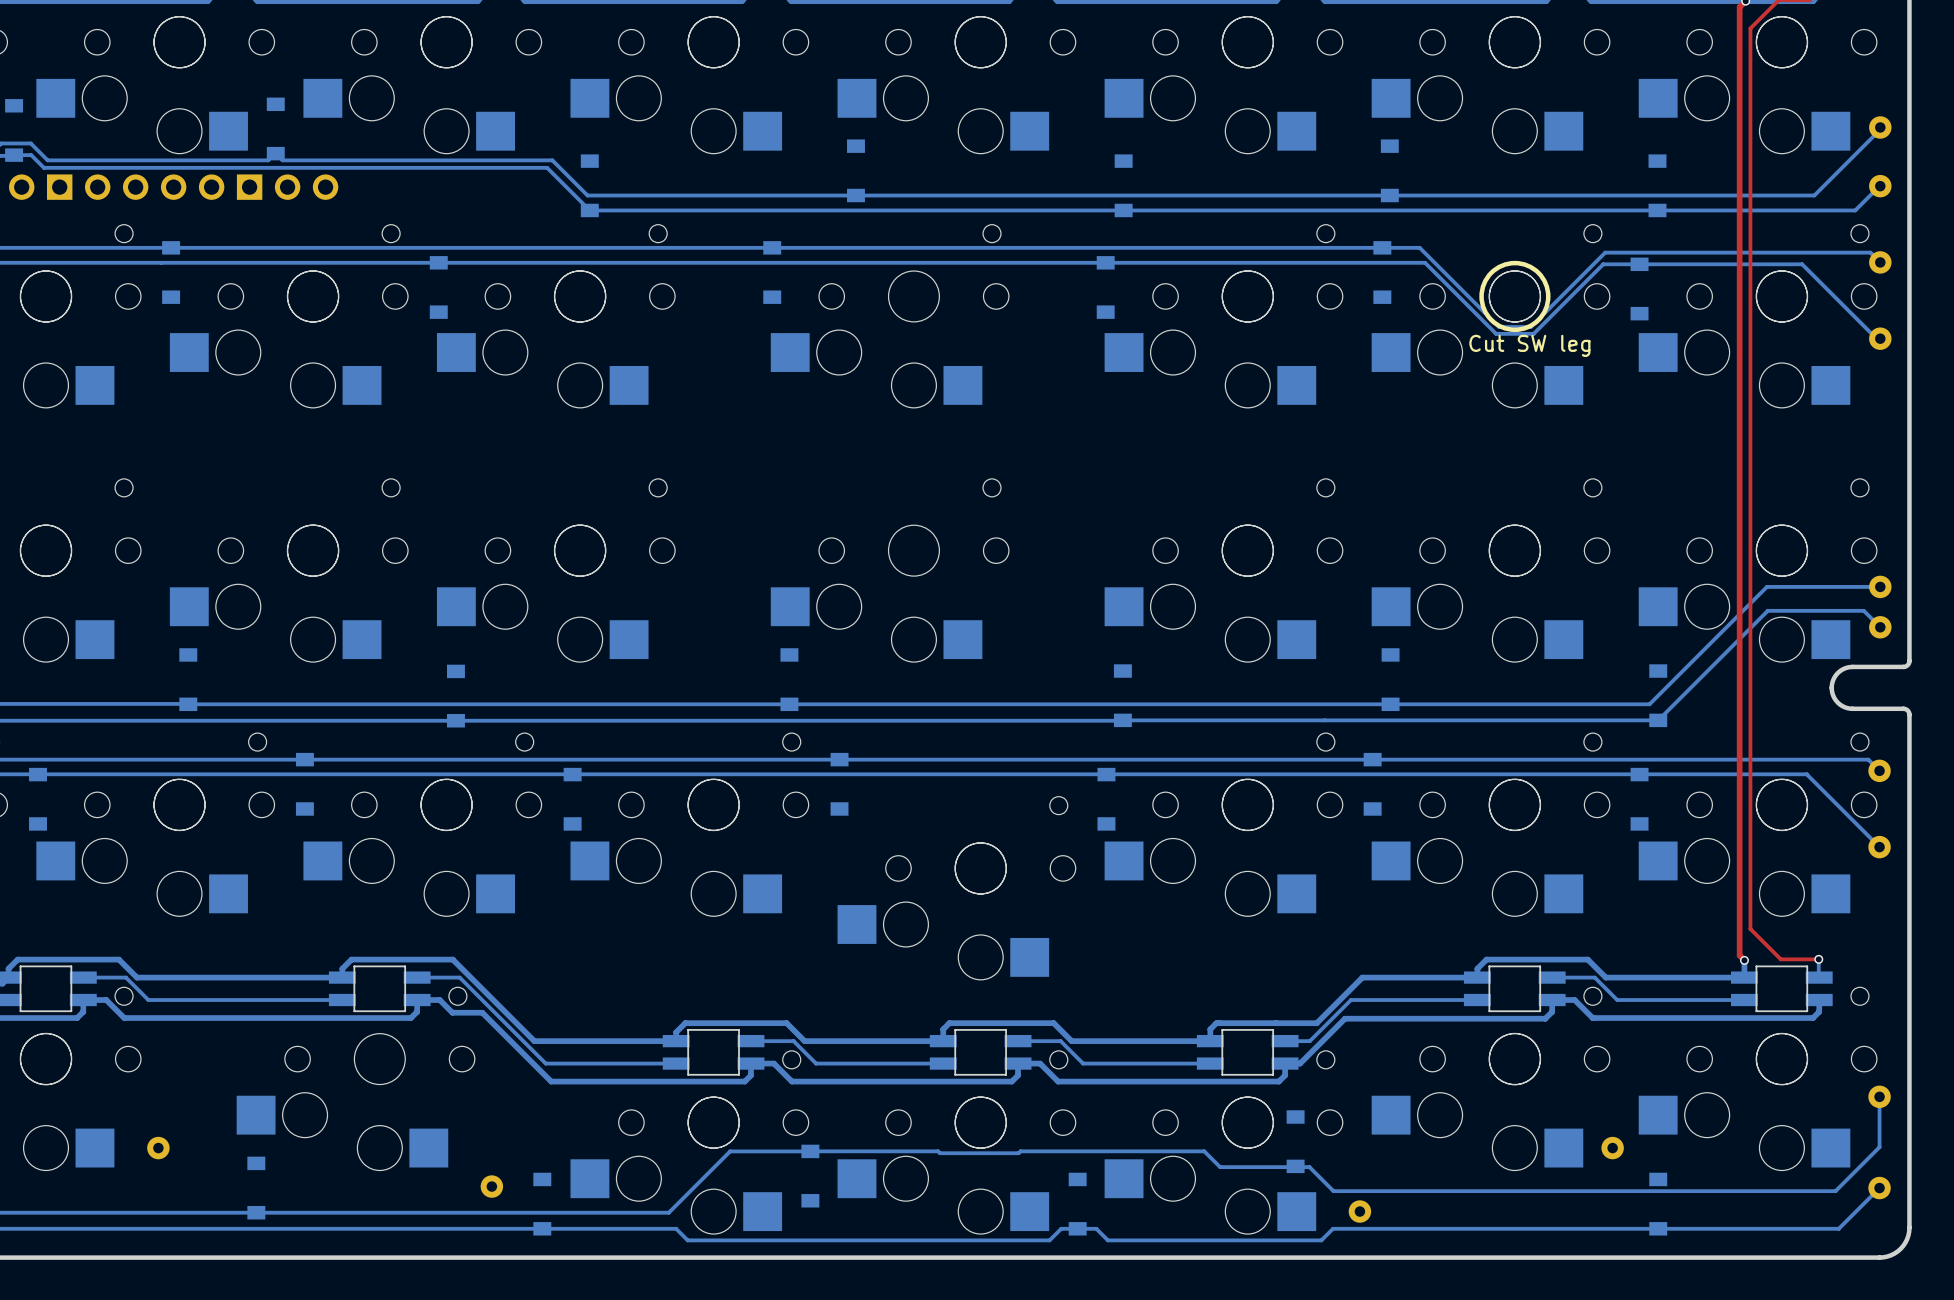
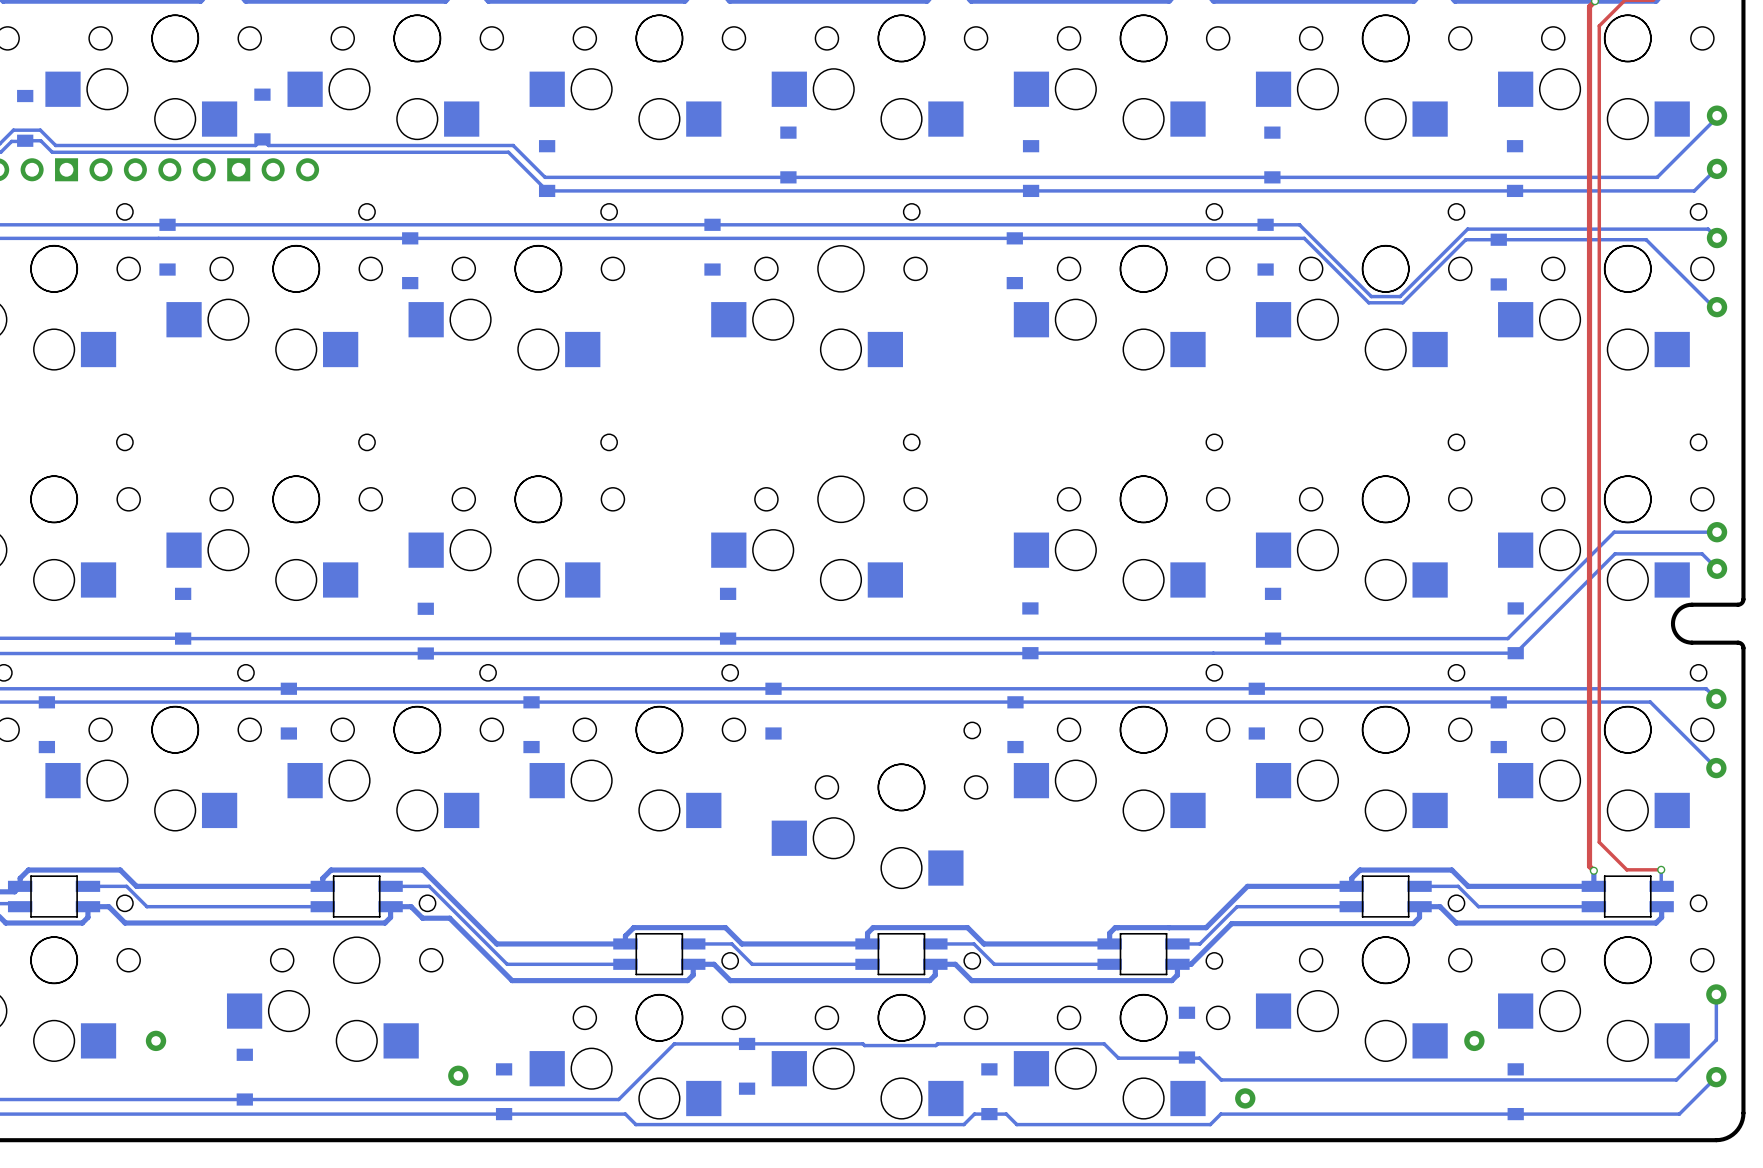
drawing: [1479, 260, 1551, 333] -> none
text: Cut SW leg (1529, 345) -> none

